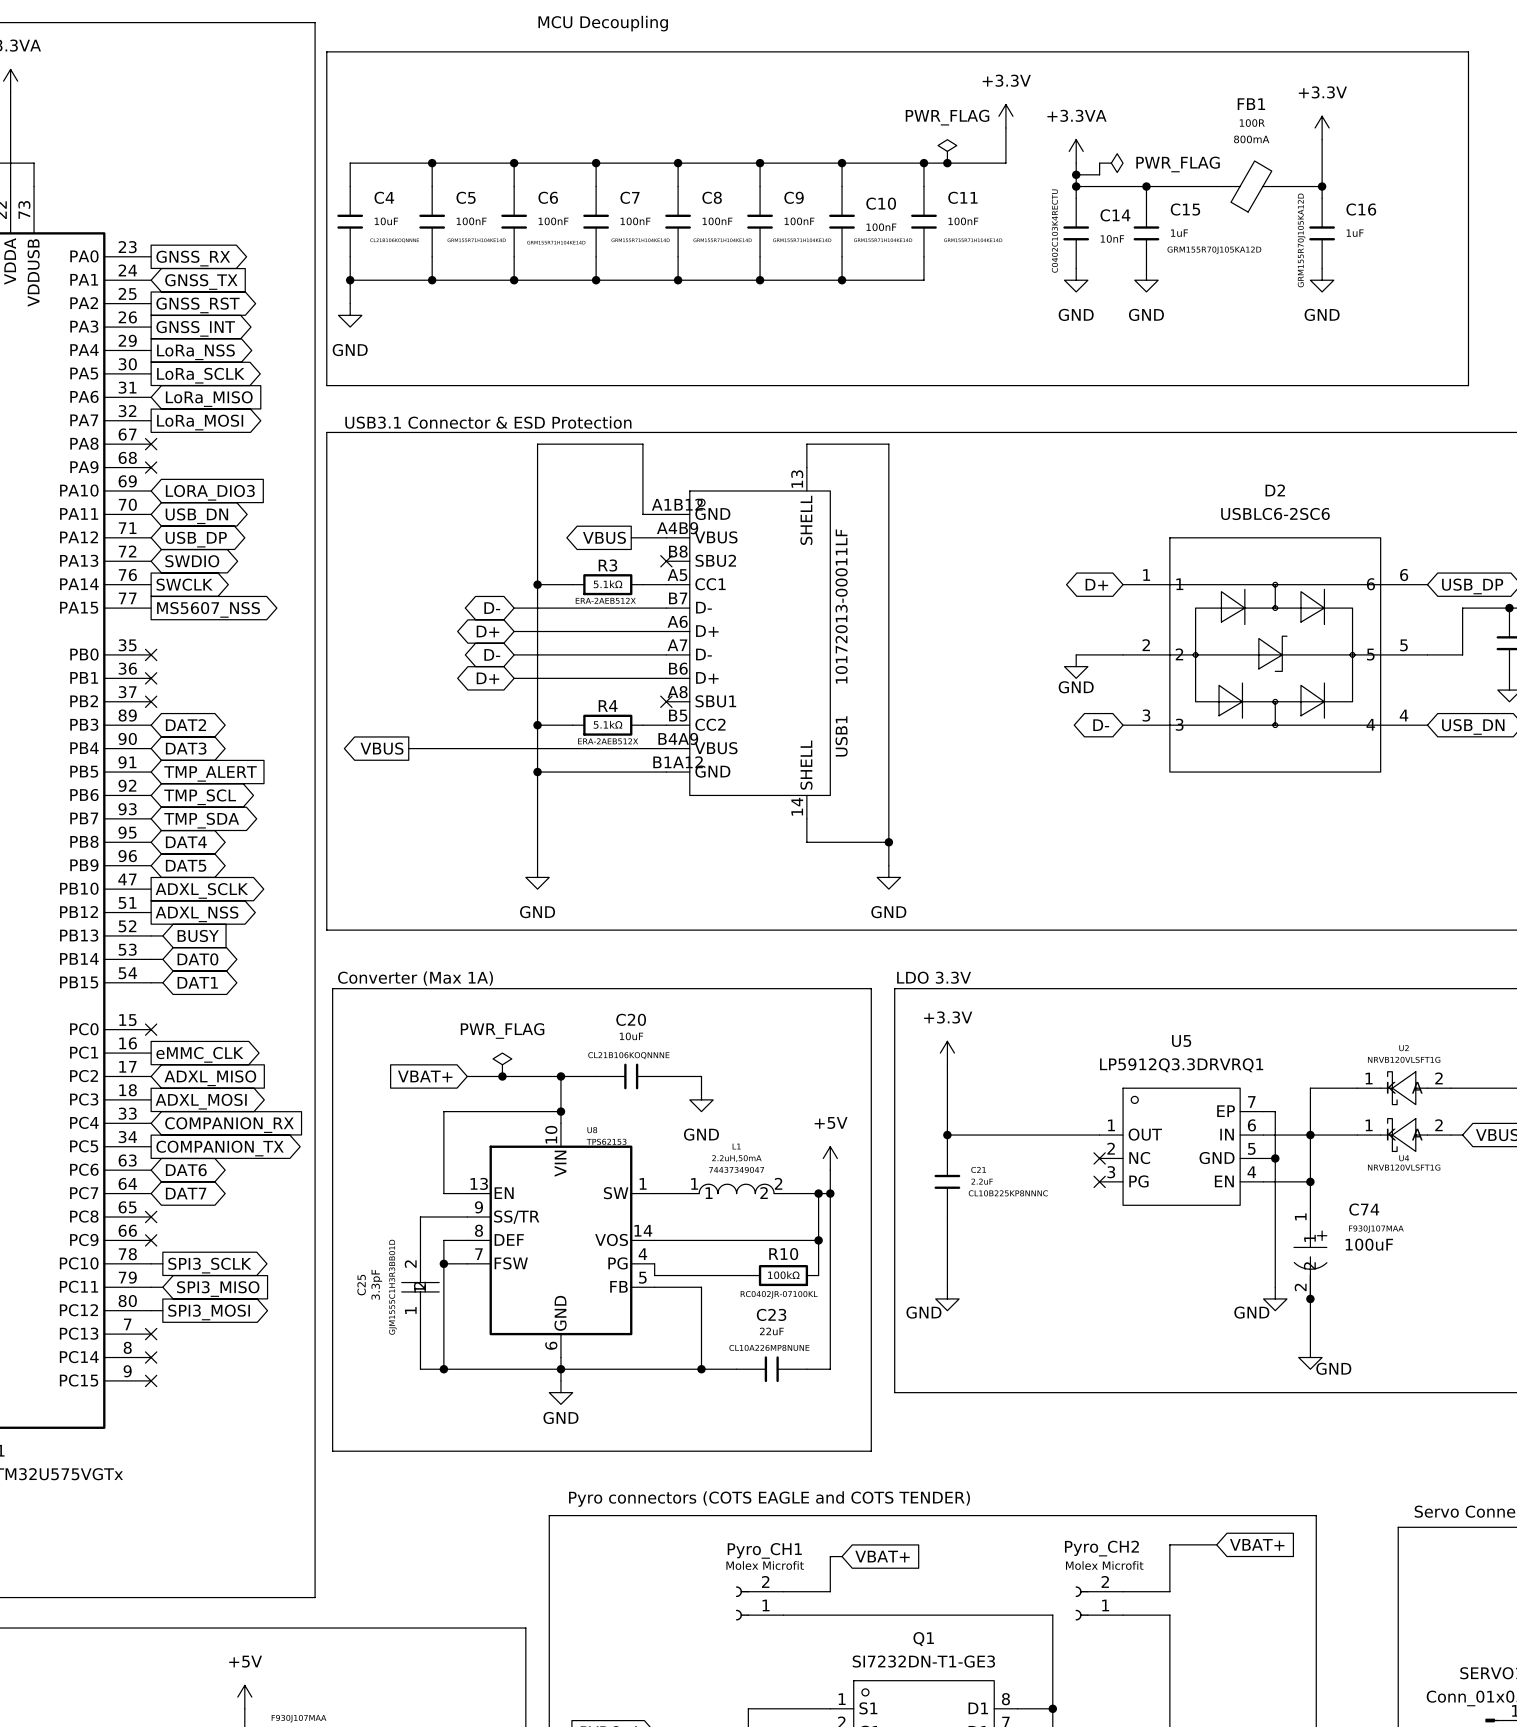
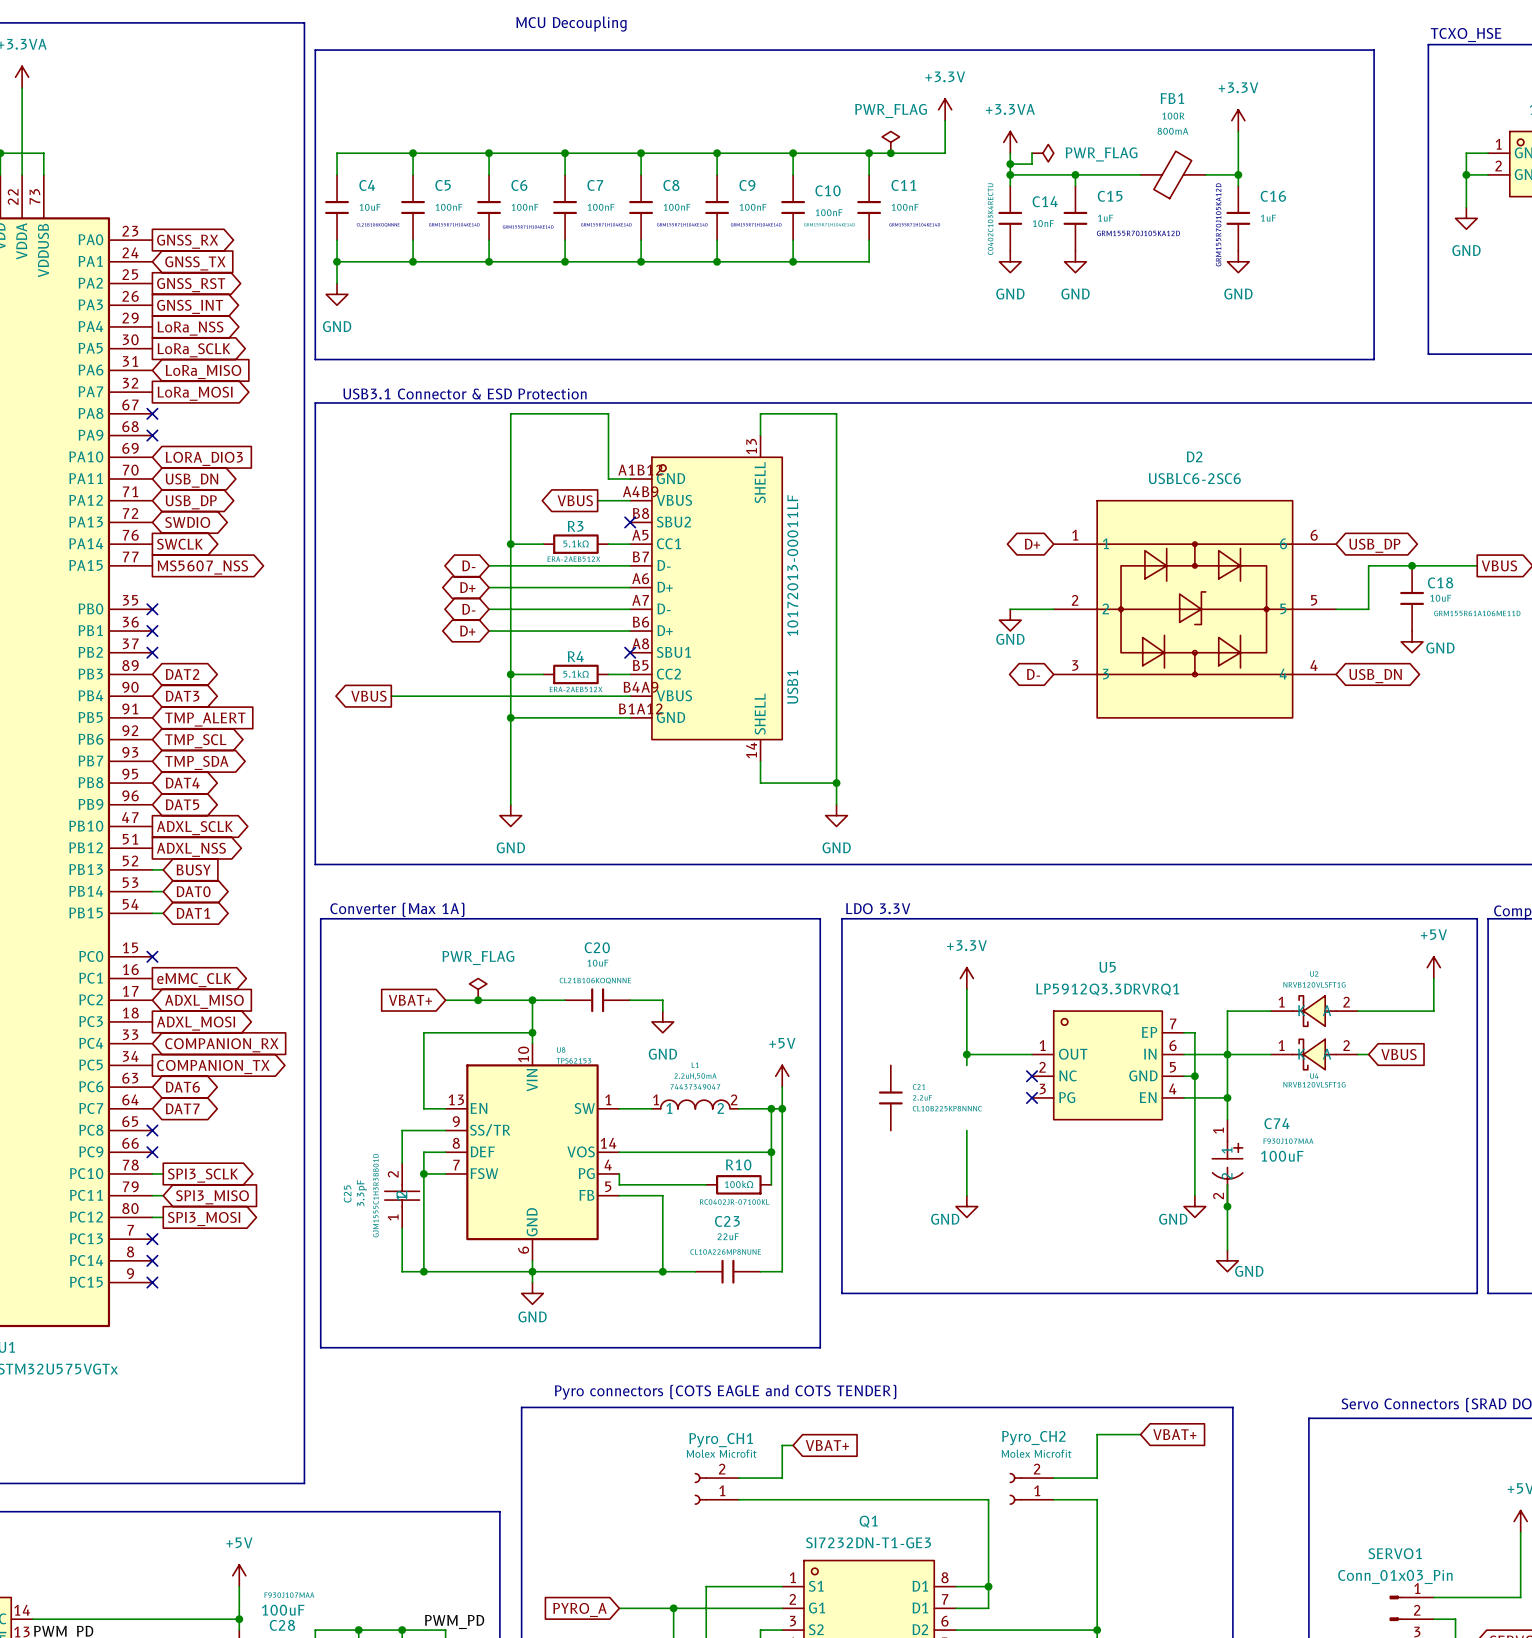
power symbol position: +3.3V (947, 1053) -> +3.3V (966, 978)
wire: (947, 1064) (947, 1146) -> (966, 989) (966, 1065)
wire: (947, 1135) (1029, 1135) -> none
junction: (947, 1135) -> none
junction: none -> (966, 1054)
wire: (947, 1216) (947, 1287) -> (966, 1130) (966, 1195)
power symbol position: GND (947, 1298) -> GND (966, 1206)

